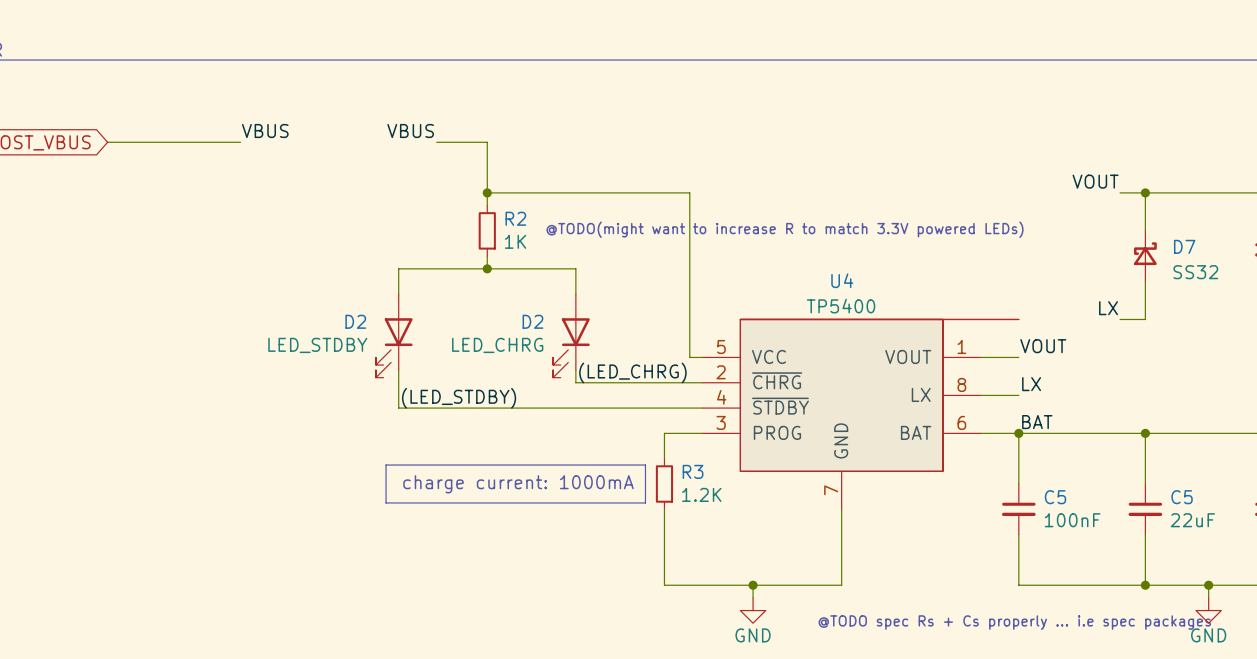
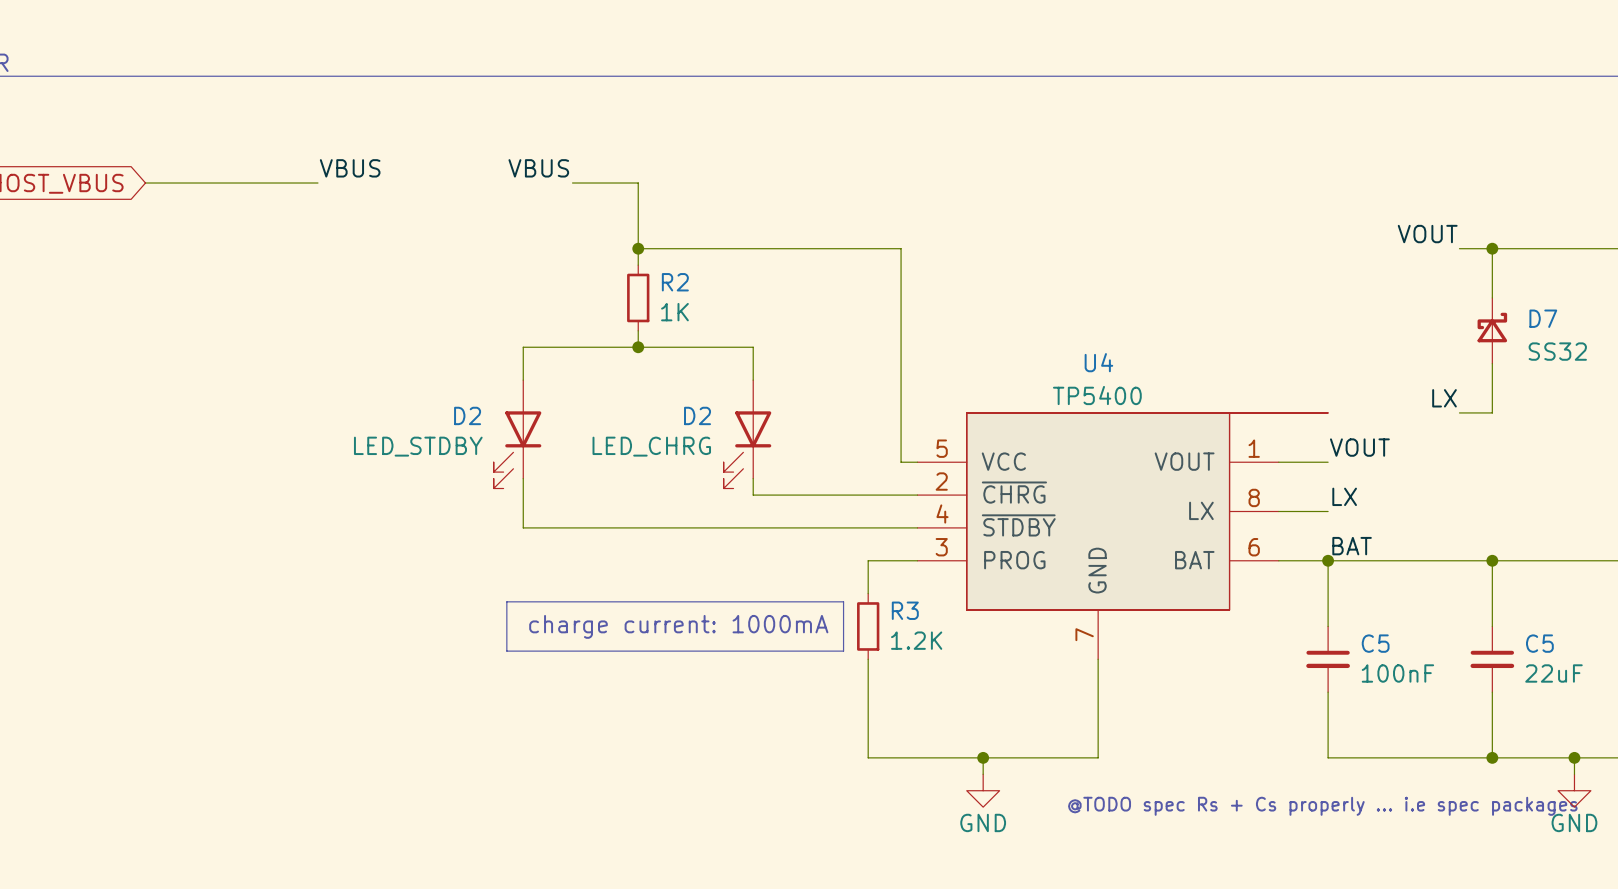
text: @TODO(might want to increase R to match 3.3V powered LEDs) (784, 229) -> none
label: (LED_CHRG) (632, 372) -> none
label: (LED_STDBY) (459, 398) -> none

